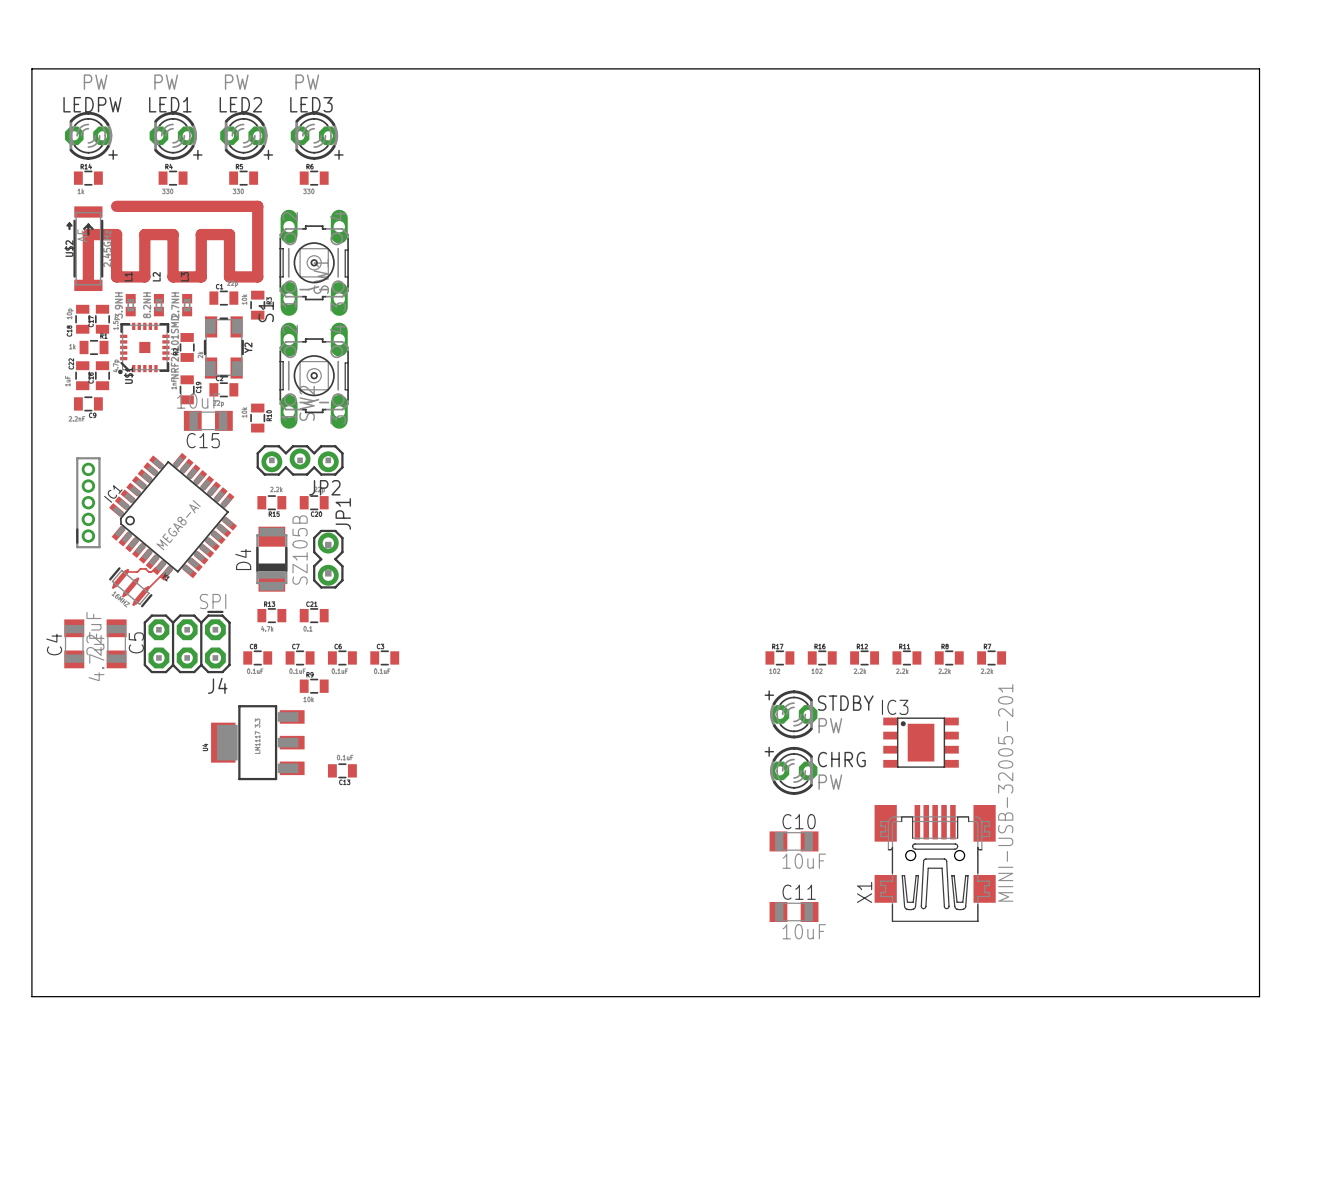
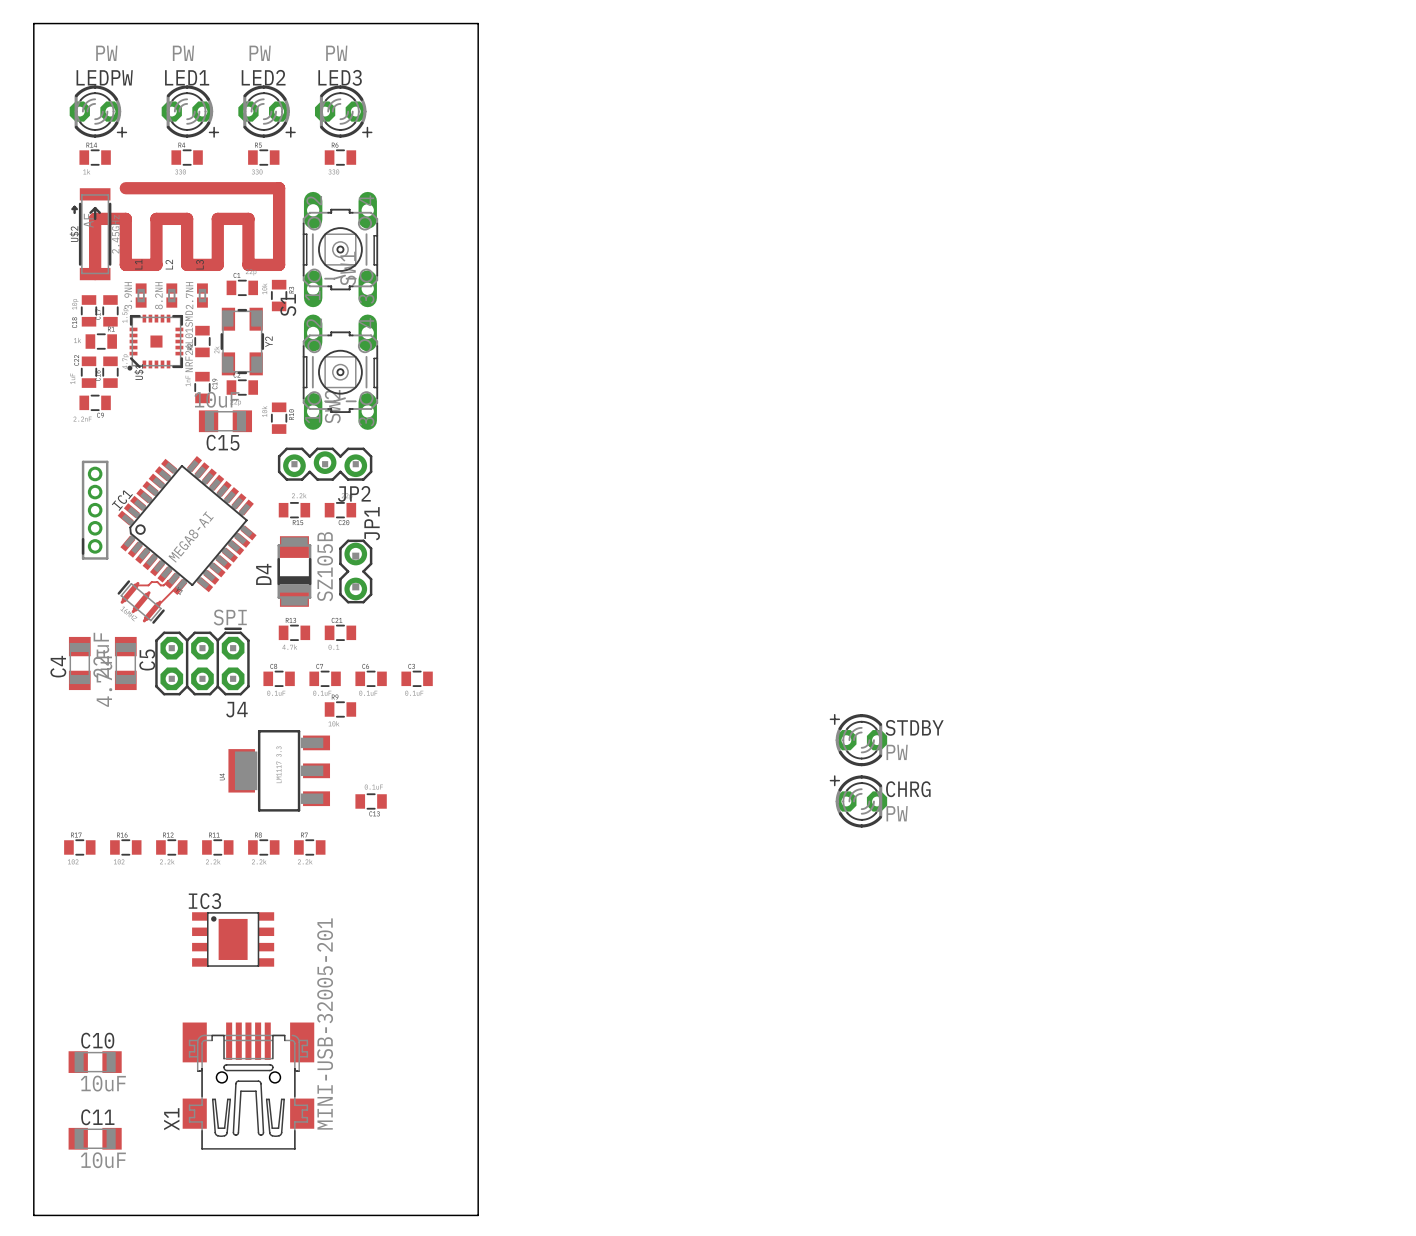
board edge: (31, 68) (1259, 68) (1259, 996) (31, 996) -> (33, 38) (33, 23) (478, 23) (478, 1215) (33, 1215) (33, 1046)
part position: (779, 657) -> (79, 847)
part position: (822, 657) -> (125, 847)
part position: (864, 657) -> (171, 847)
part position: (906, 657) -> (217, 847)
part position: (949, 657) -> (263, 847)
part position: (991, 657) -> (309, 847)
IC3 position: (921, 742) -> (233, 939)
C10 position: (794, 841) -> (95, 1062)
X1 position: (935, 863) -> (248, 1086)
C11 position: (794, 911) -> (95, 1138)

